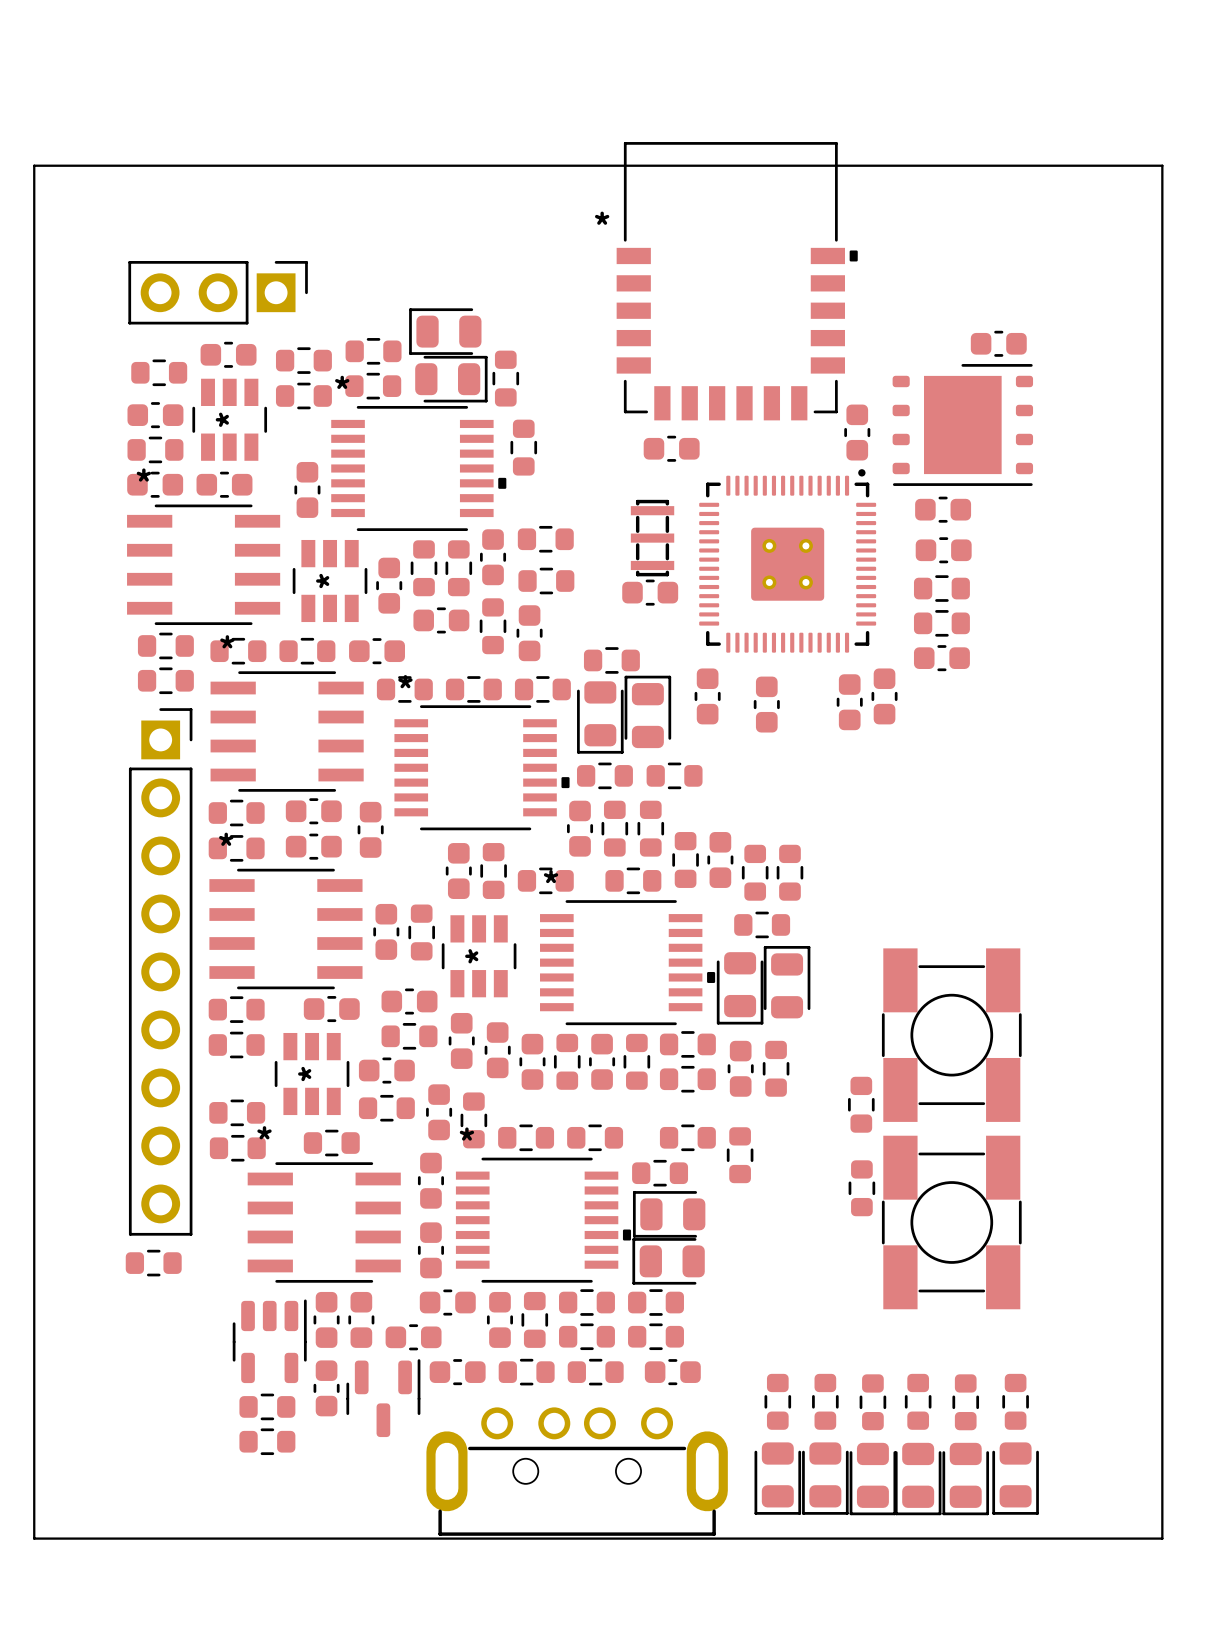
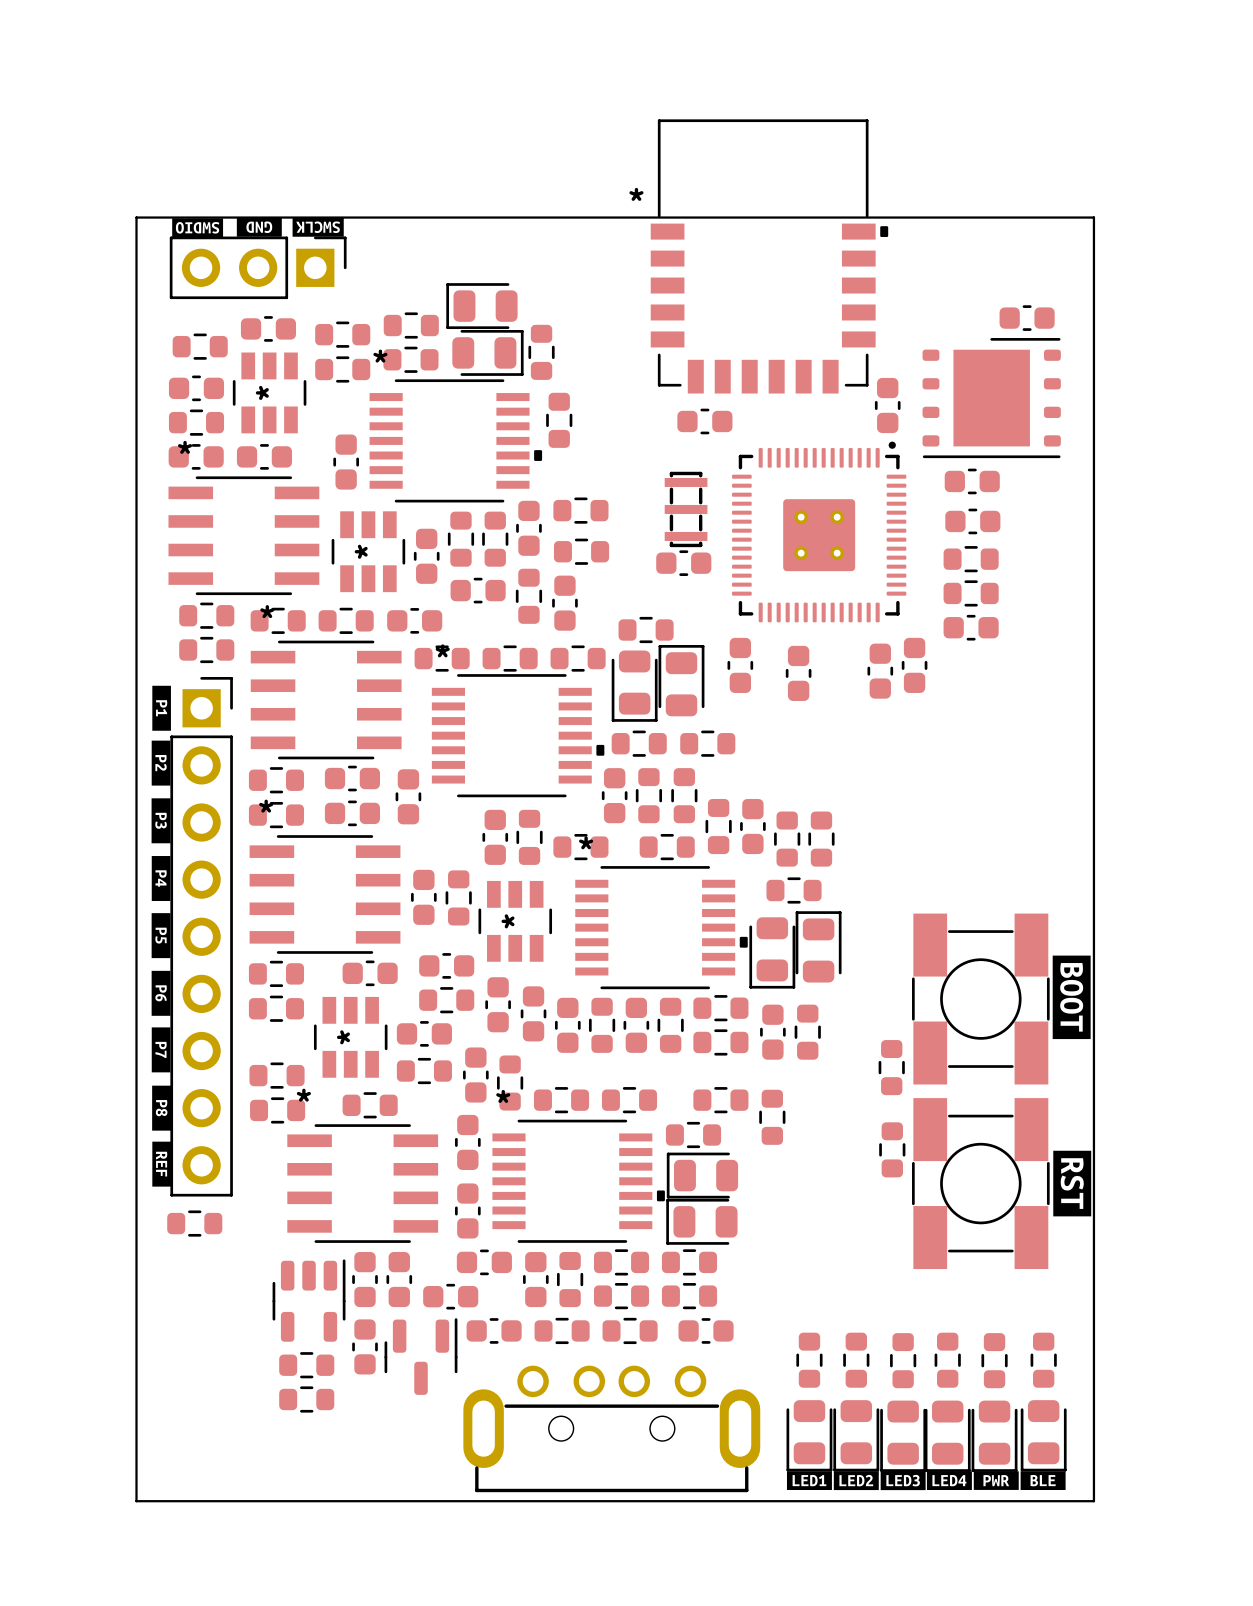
board edge: (34, 165) (1162, 165) (1162, 1538) (34, 1538) (34, 165) -> (136, 217) (136, 1501) (1093, 1501) (1093, 217) (136, 217)
drawing: none -> [172, 217, 344, 238]
drawing: none -> [151, 685, 172, 1187]
drawing: none -> [1052, 955, 1091, 1040]
drawing: none -> [1053, 1150, 1092, 1217]
drawing: none -> [786, 1471, 1066, 1491]

